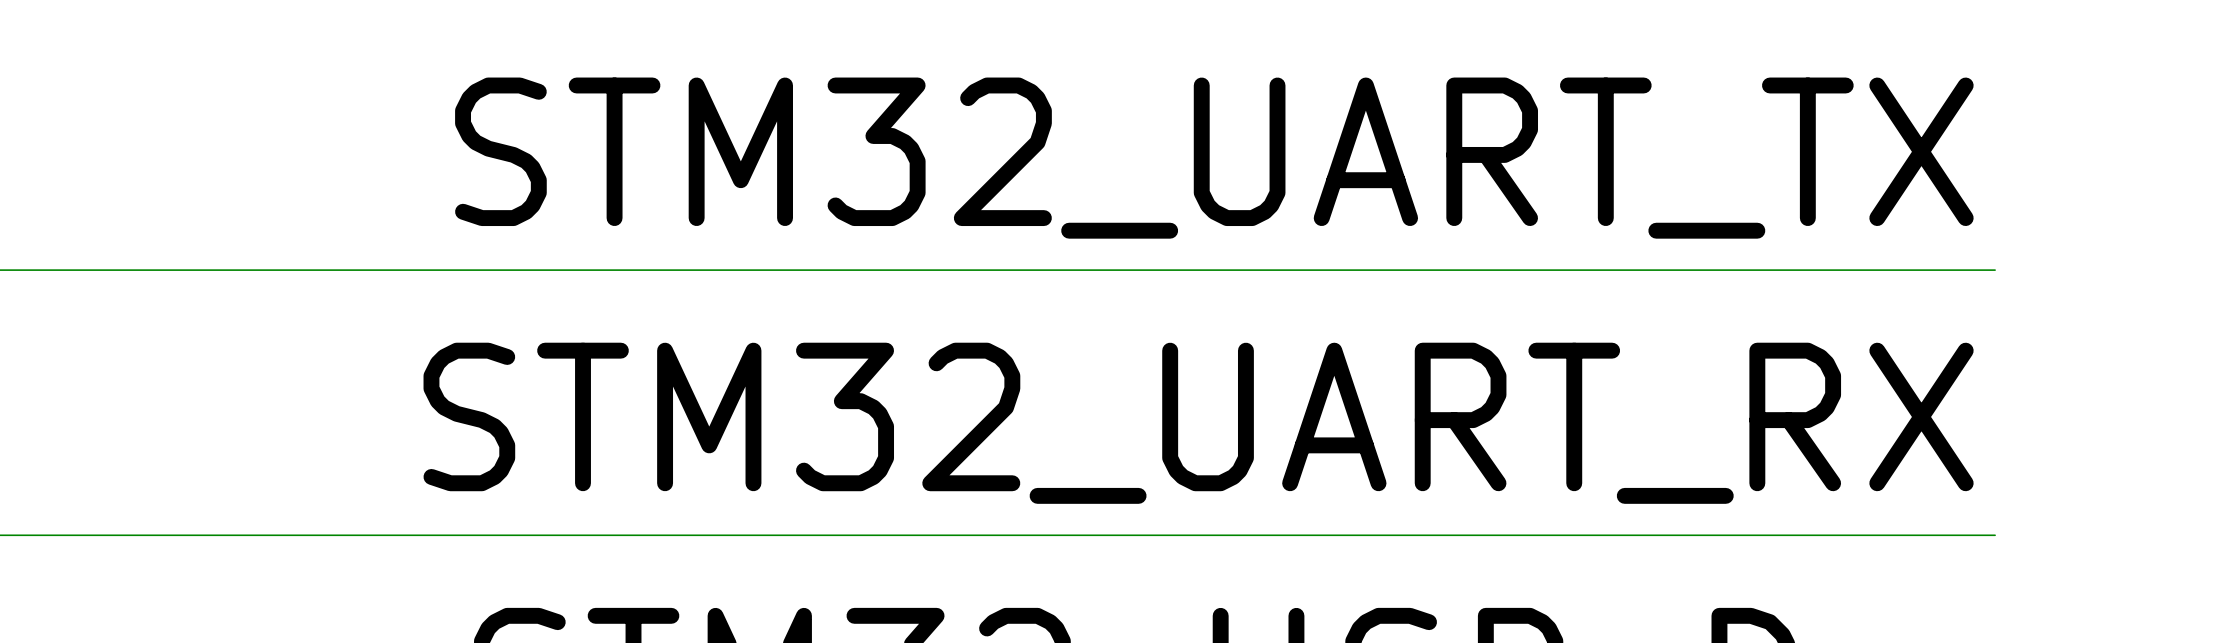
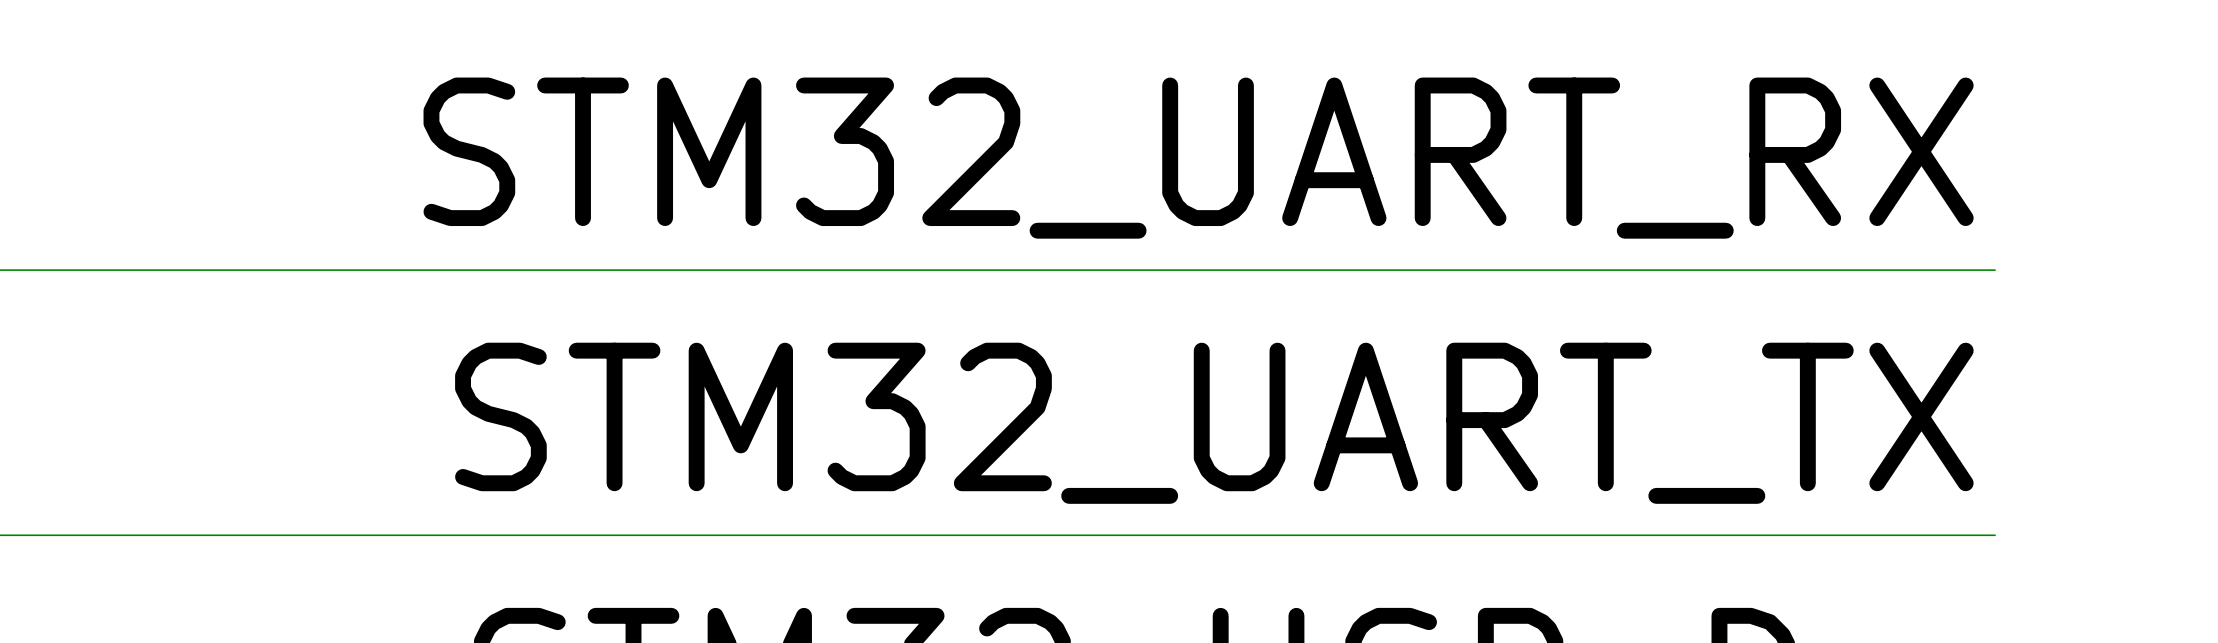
label: STM32_UART_TX (1214, 158) -> STM32_UART_RX (1198, 158)
label: STM32_UART_RX (1198, 423) -> STM32_UART_TX (1214, 423)

